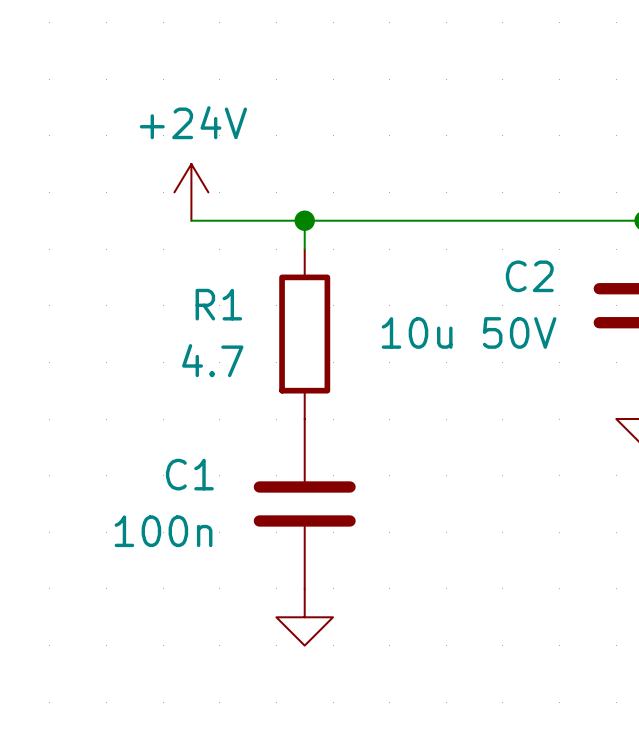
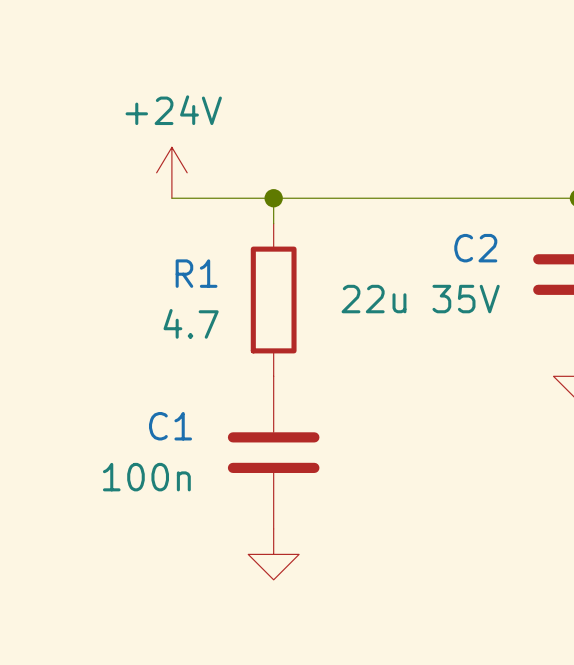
C2 value: 10u 50V (469, 332) -> 22u 35V (420, 299)

